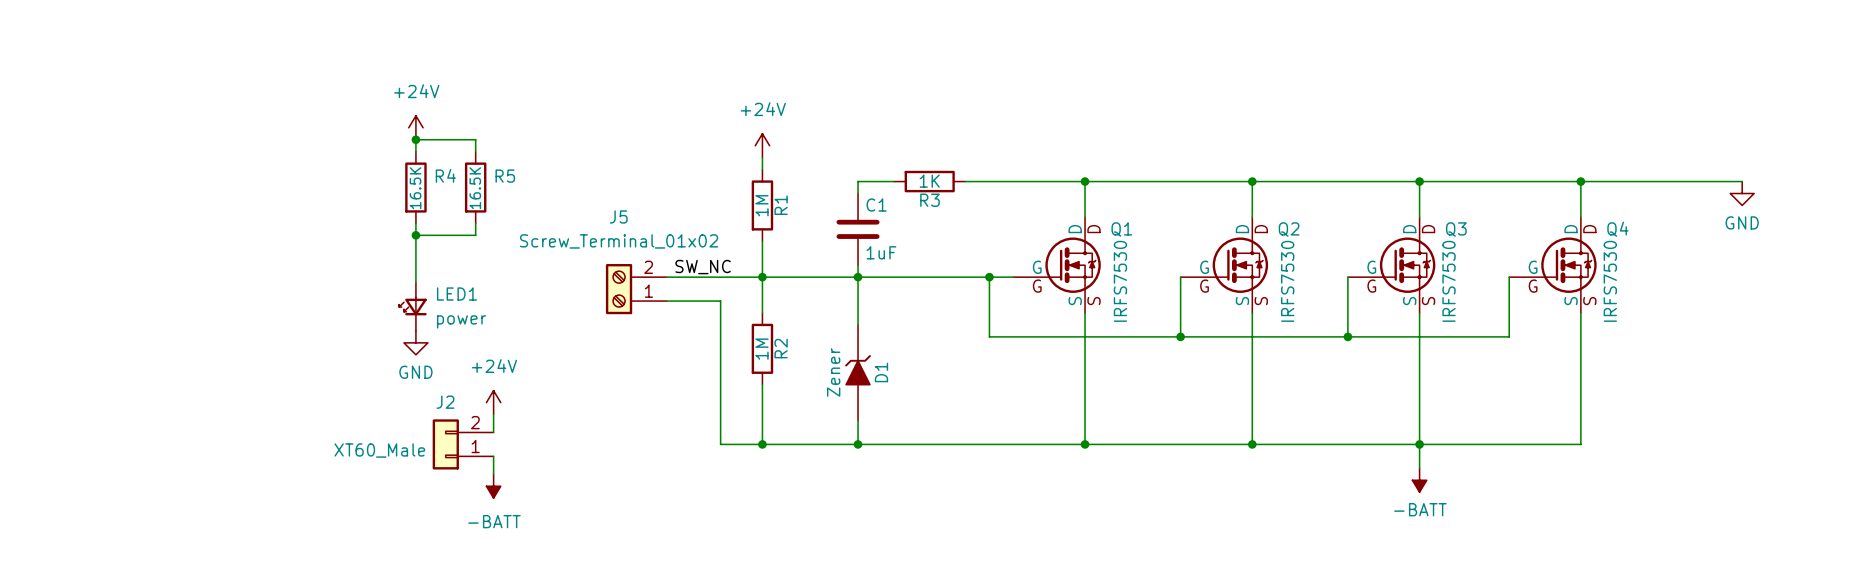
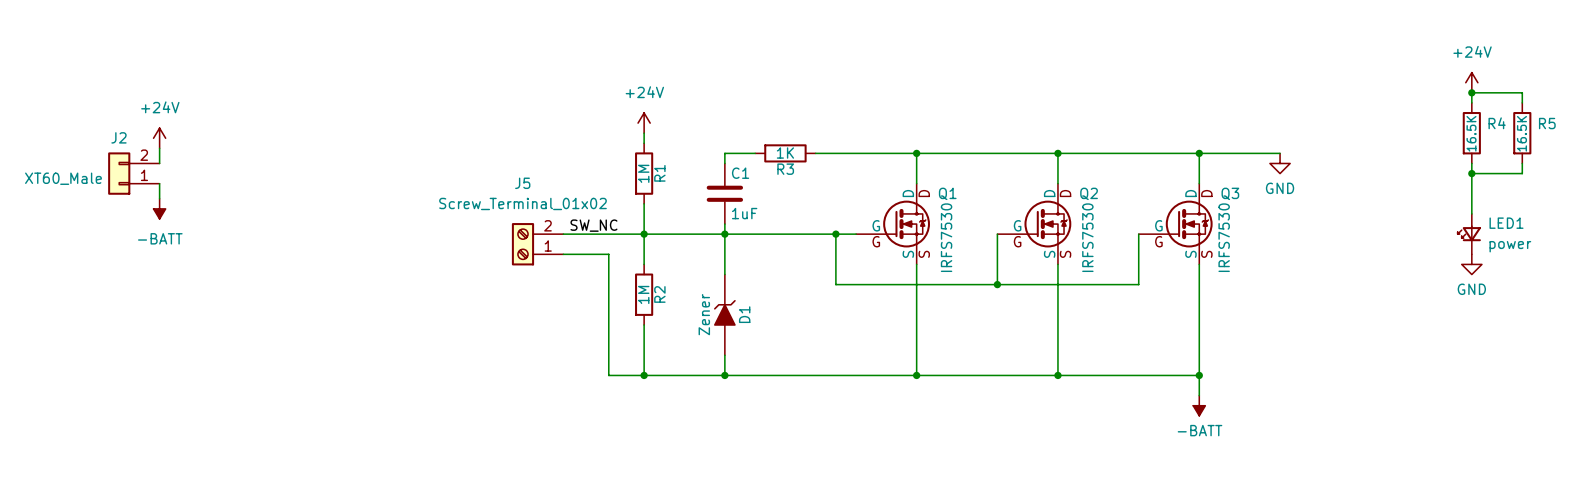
power symbol: none -> +24V (1471, 82)
junction: none -> (1471, 92)
wire: none -> (1471, 102) (1471, 92) (1522, 92) (1522, 102)
power symbol: +24V (415, 127) -> none
junction: (415, 139) -> none
wire: (415, 151) (415, 139) (475, 139) (475, 151) -> none
power symbol: none -> +24V (159, 138)
wire: none -> (159, 148) (159, 163)
wire: (1515, 181) (1742, 181) -> none
wire: (1580, 181) (1580, 217) -> none
junction: (1580, 181) -> none
R4 position: (415, 187) -> (1471, 133)
R5 position: (475, 187) -> (1522, 133)
power symbol: none -> GND (1280, 163)
wire: none -> (1471, 163) (1471, 213)
power symbol: GND (1742, 193) -> none
wire: none -> (1522, 163) (1522, 173) (1471, 173)
junction: none -> (1471, 173)
wire: none -> (159, 183) (159, 198)
wire: (415, 223) (415, 283) -> none
wire: (475, 223) (475, 235) (415, 235) -> none
junction: (415, 235) -> none
power symbol: none -> -BATT (159, 208)
Q4: IRFS7530 (1552, 265) -> none
wire: (1509, 277) (1509, 336) (1347, 336) -> none
LED1 position: (412, 307) -> (1469, 234)
wire: (1580, 312) (1580, 444) (1419, 444) -> none
power symbol: none -> GND (1471, 264)
junction: (1347, 336) -> none
power symbol: GND (415, 342) -> none
power symbol: +24V (493, 402) -> none
wire: (493, 414) (493, 432) -> none
J2 position: (463, 444) -> (133, 173)
wire: (493, 456) (493, 474) -> none
power symbol: -BATT (493, 486) -> none

